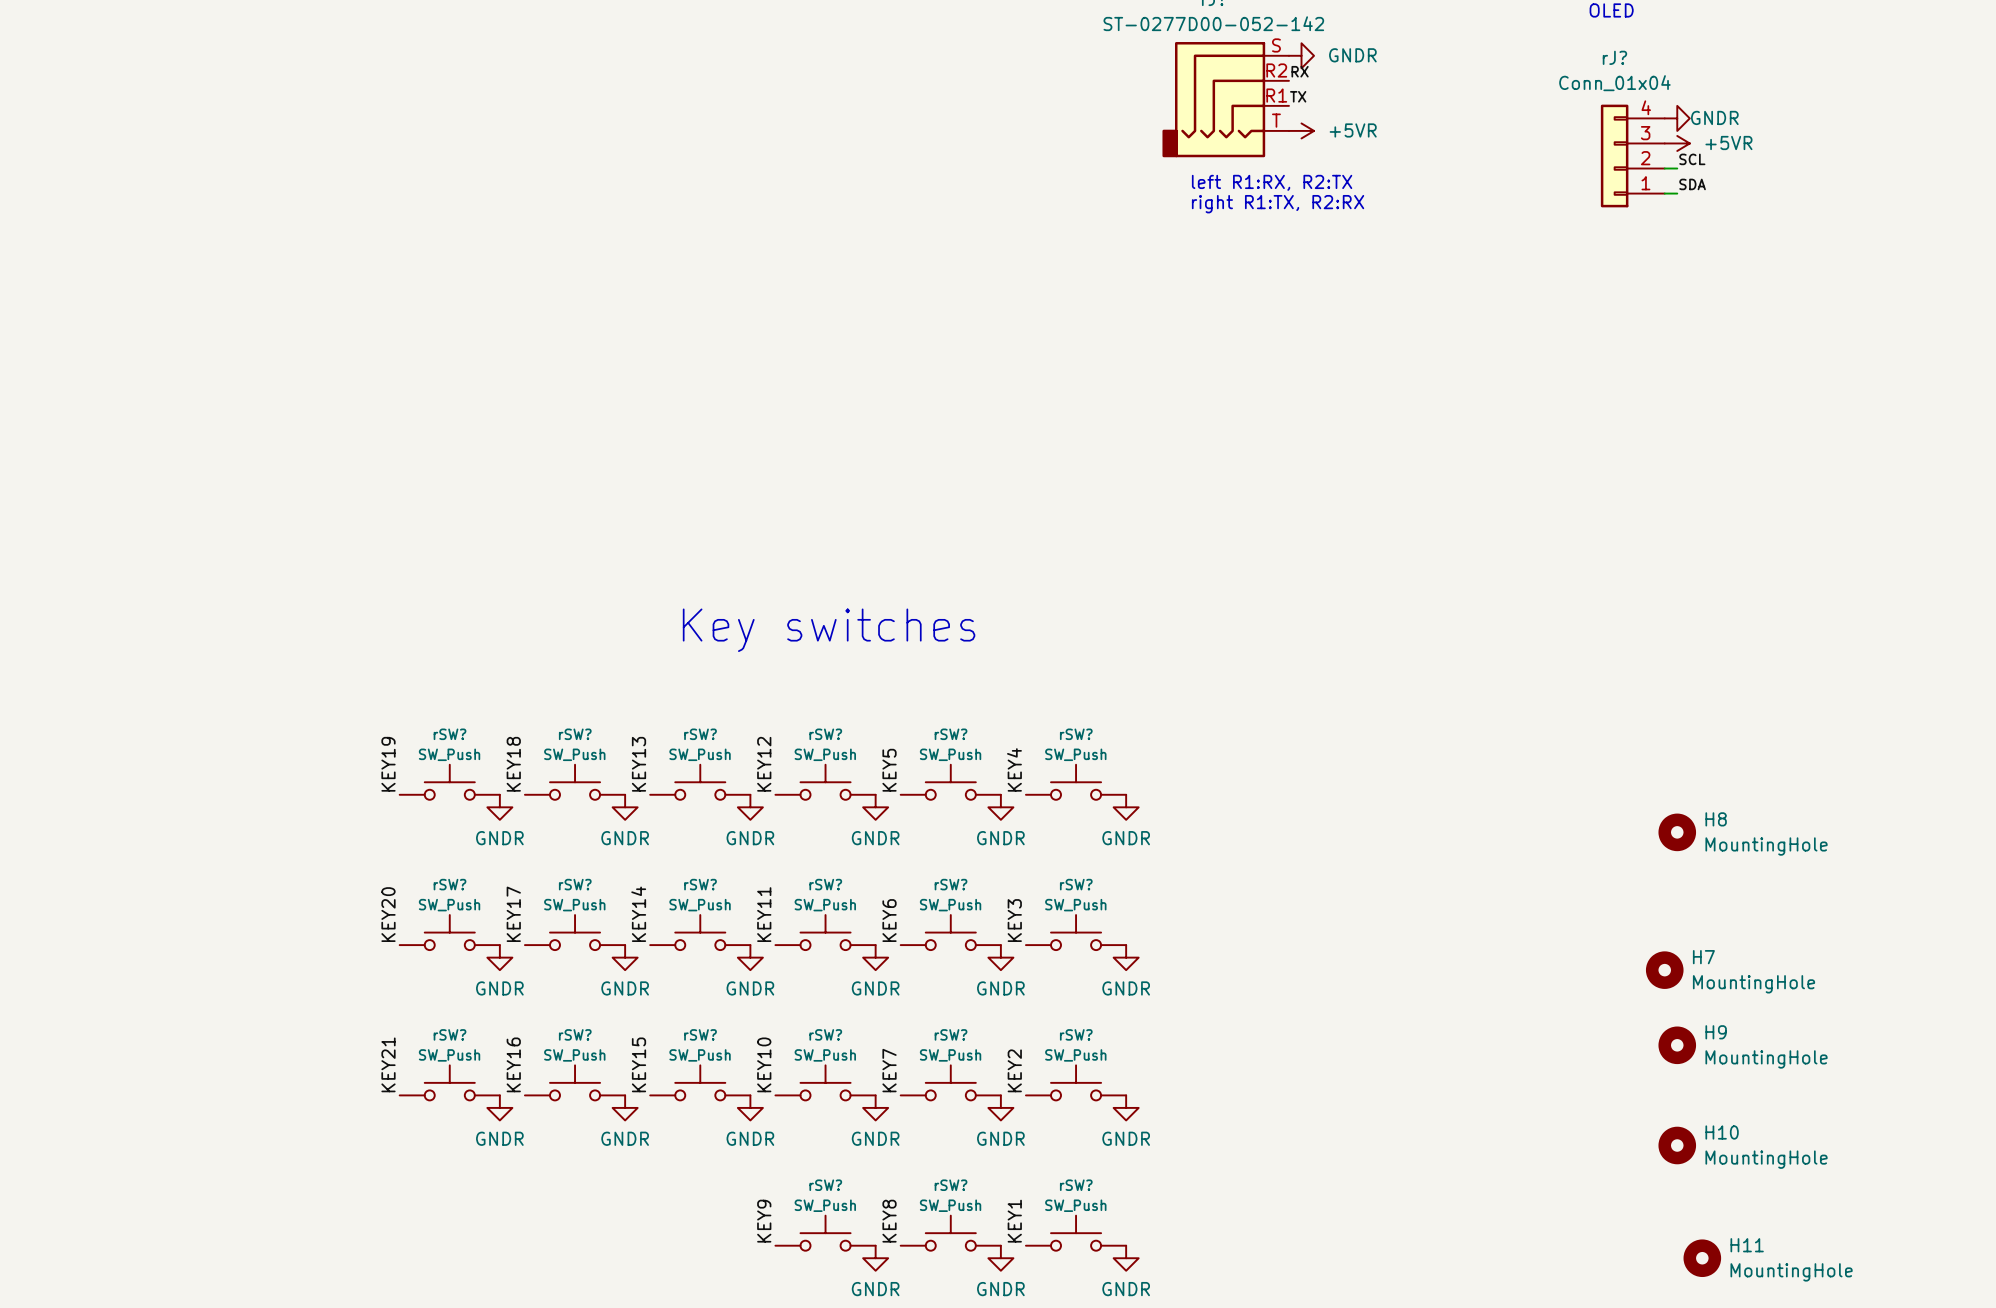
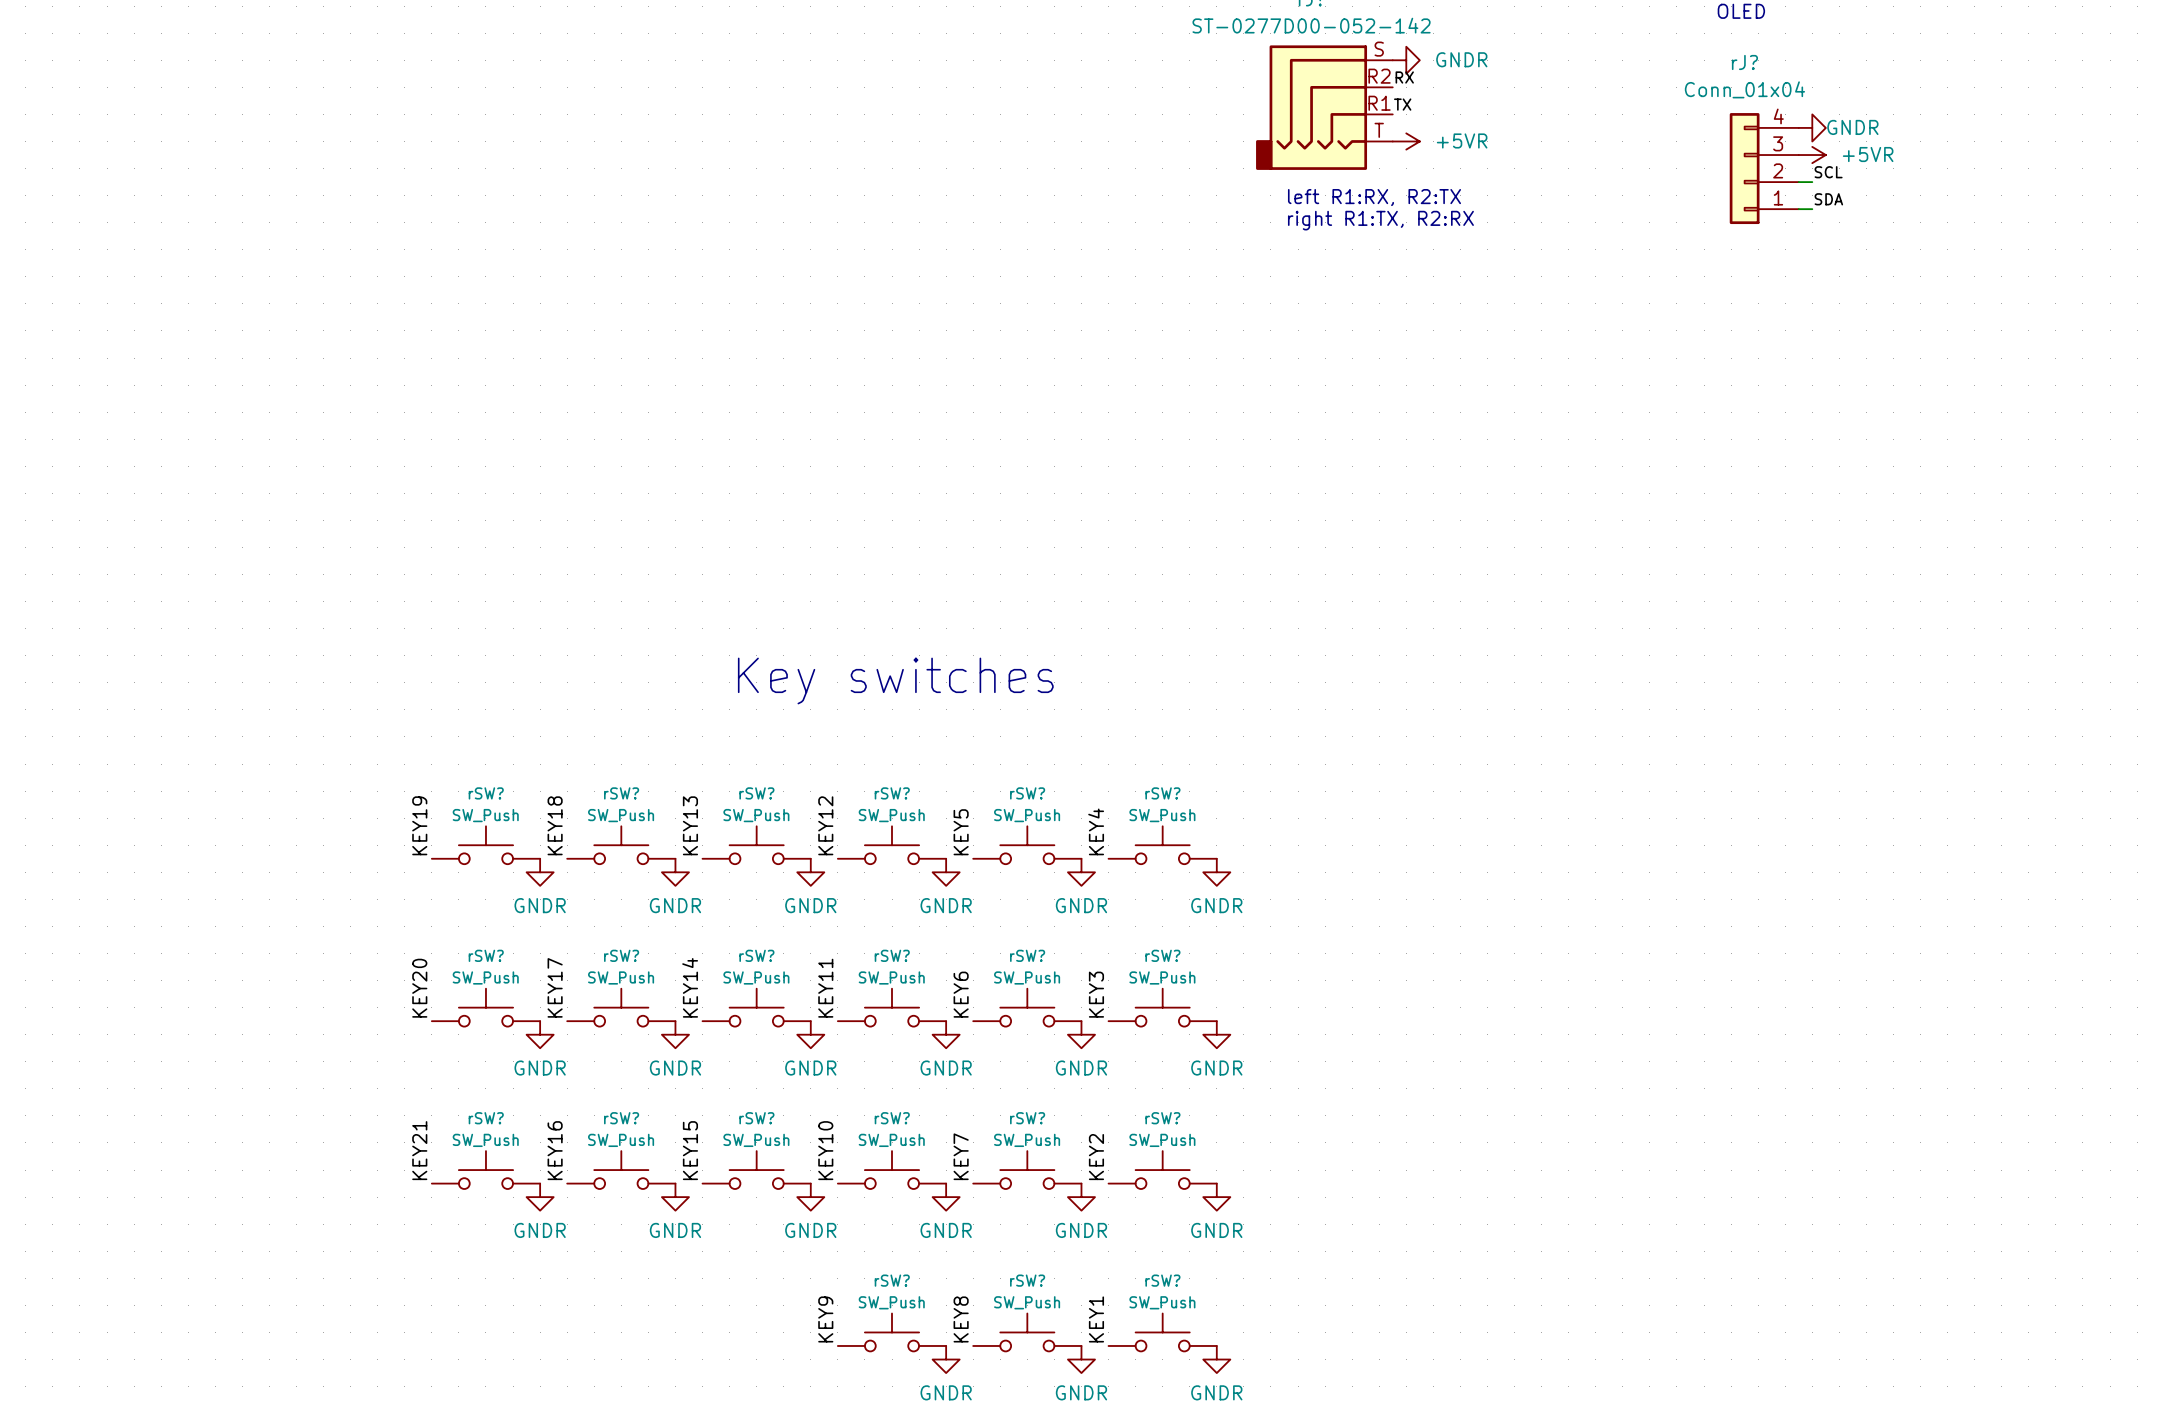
H8: MountingHole (1677, 832) -> none
H7: MountingHole (1664, 970) -> none
H9: MountingHole (1677, 1045) -> none
H10: MountingHole (1677, 1145) -> none
H11: MountingHole (1702, 1258) -> none

